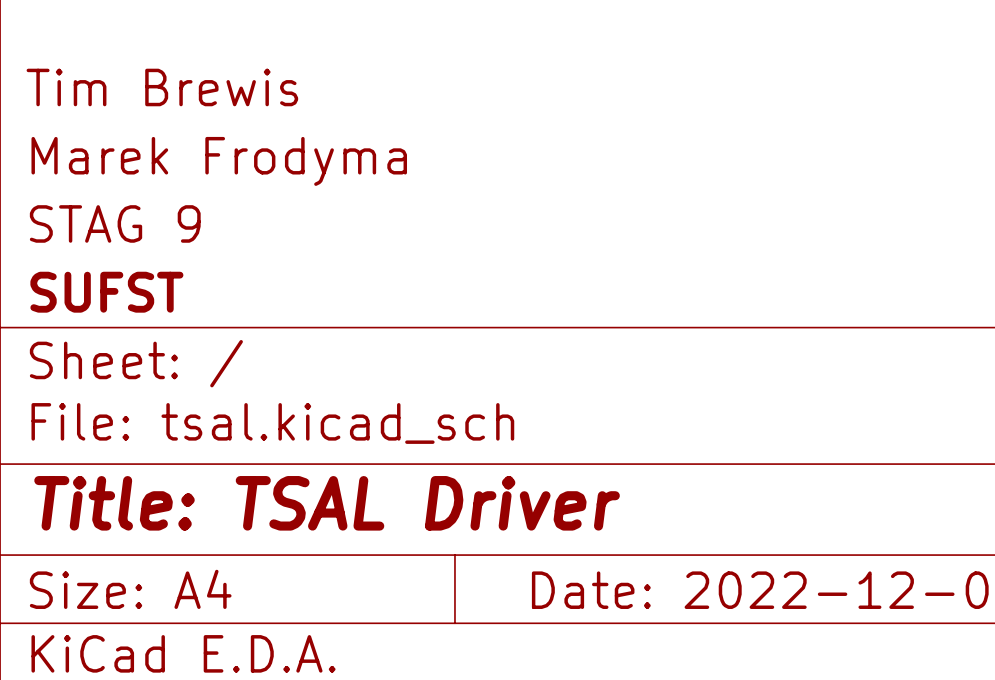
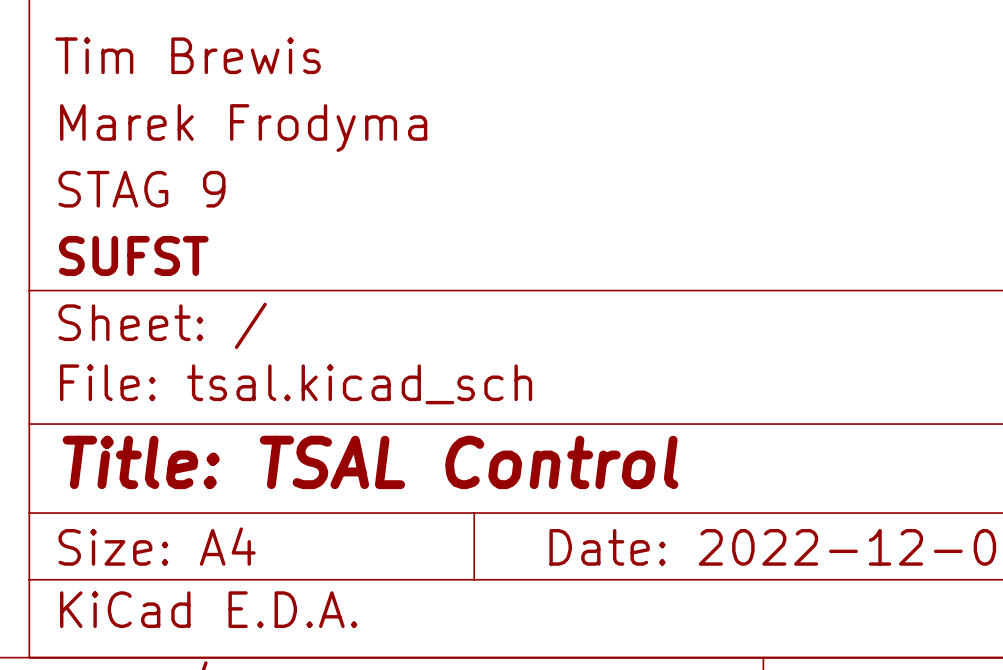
title block: Title: TSAL Driver (327, 503) -> Title: TSAL Control (370, 462)

